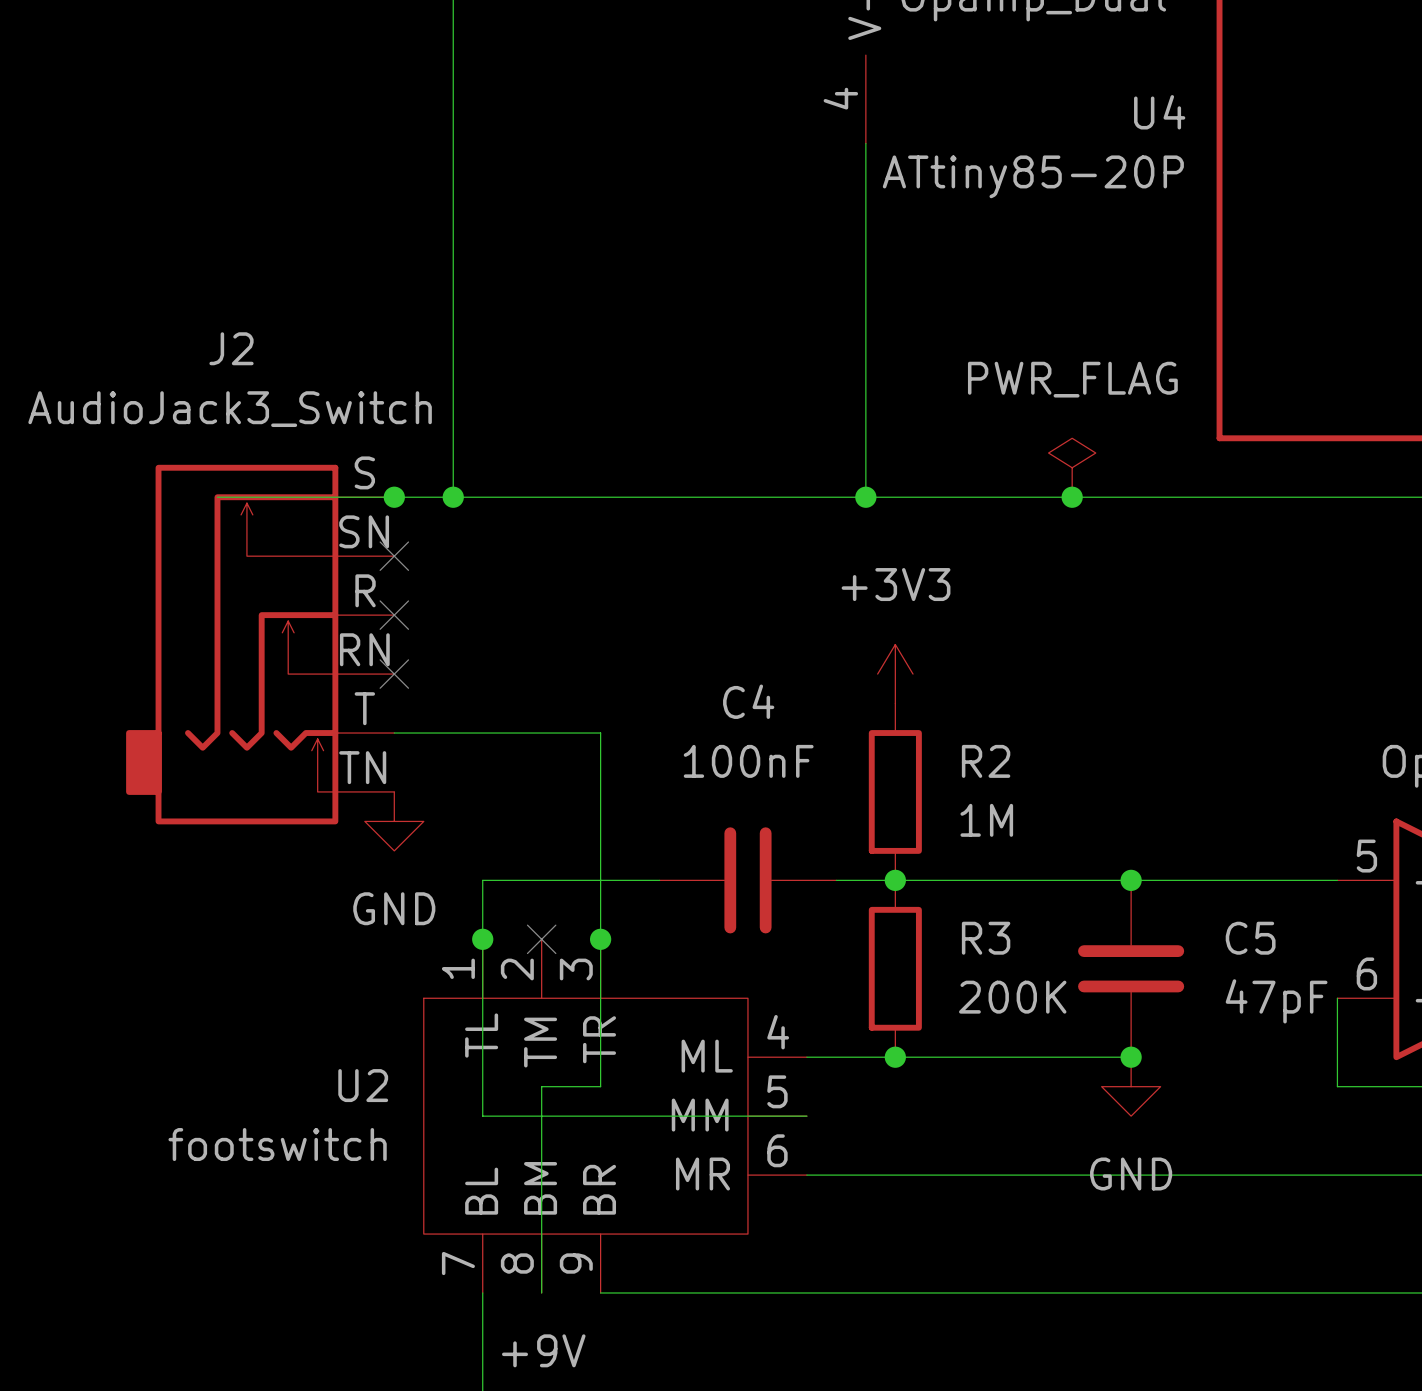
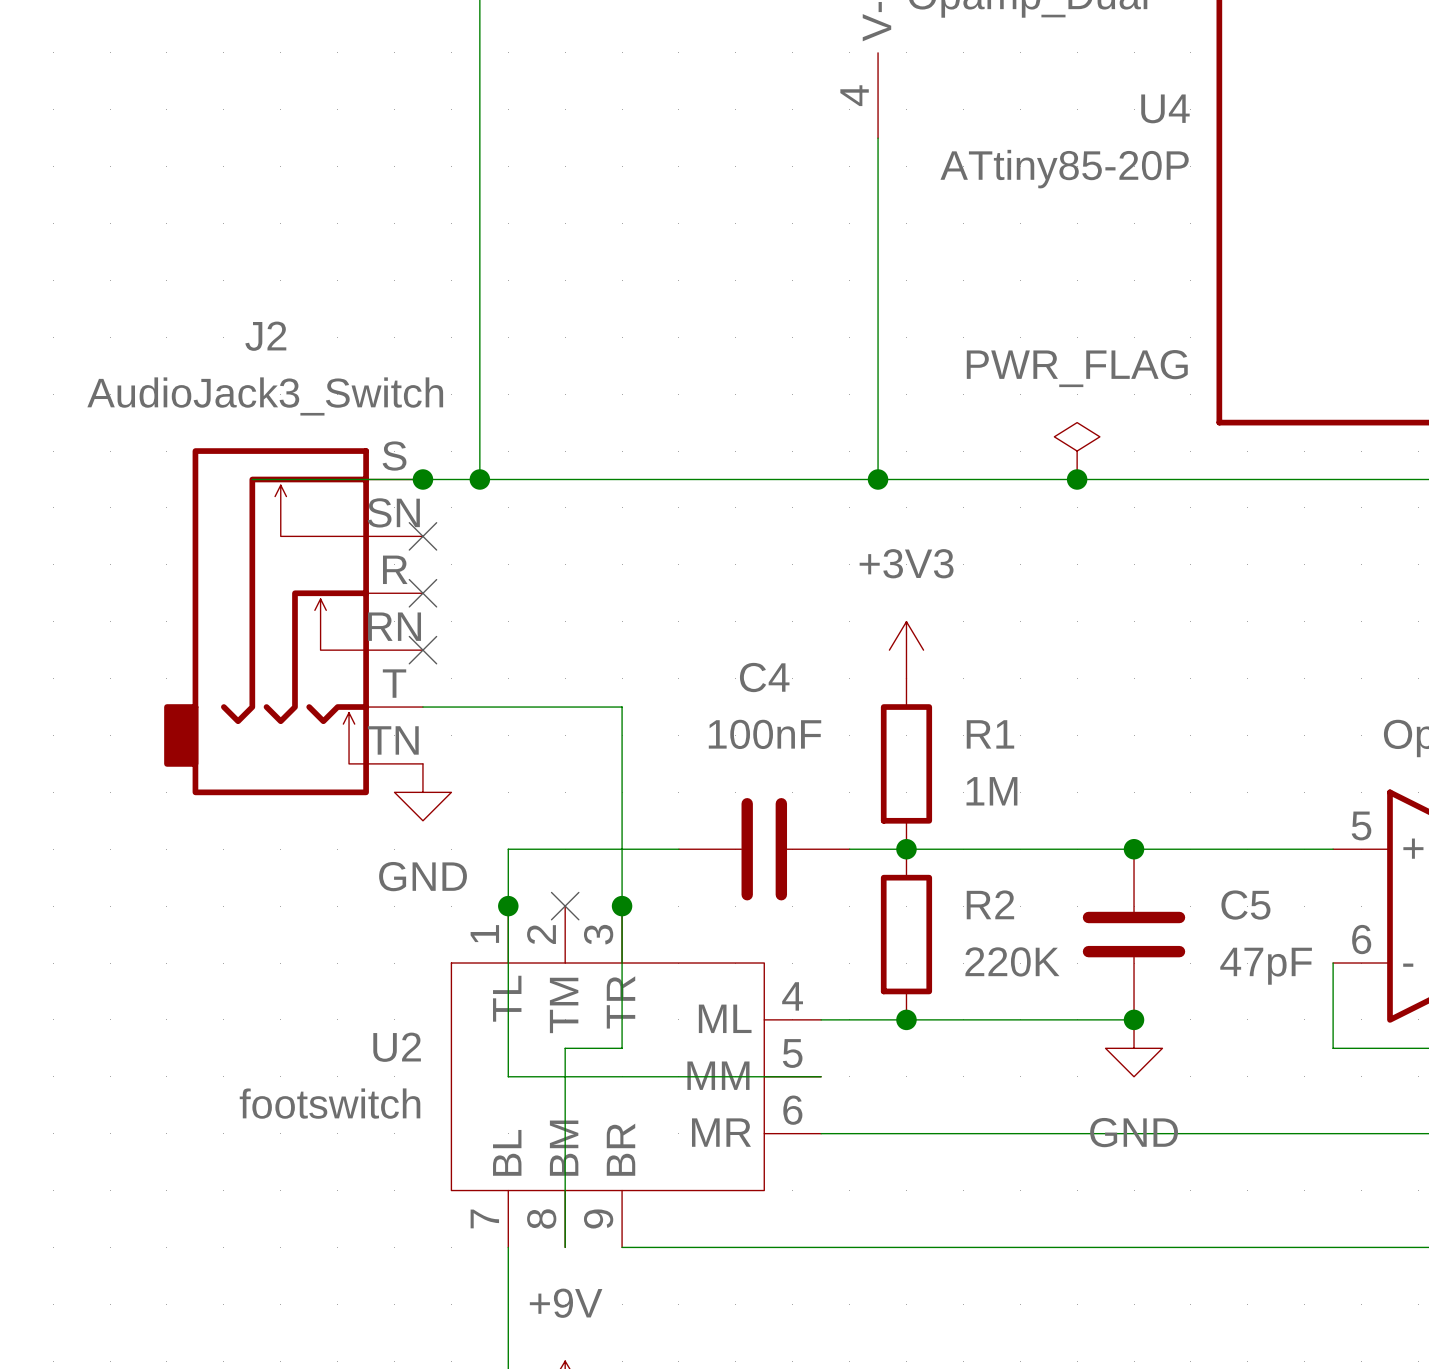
R2 name: R2 (986, 761) -> R1 (990, 734)
R3 name: R3 (986, 938) -> R2 (990, 904)
R3 value: 200K (1012, 997) -> 220K (1012, 961)

